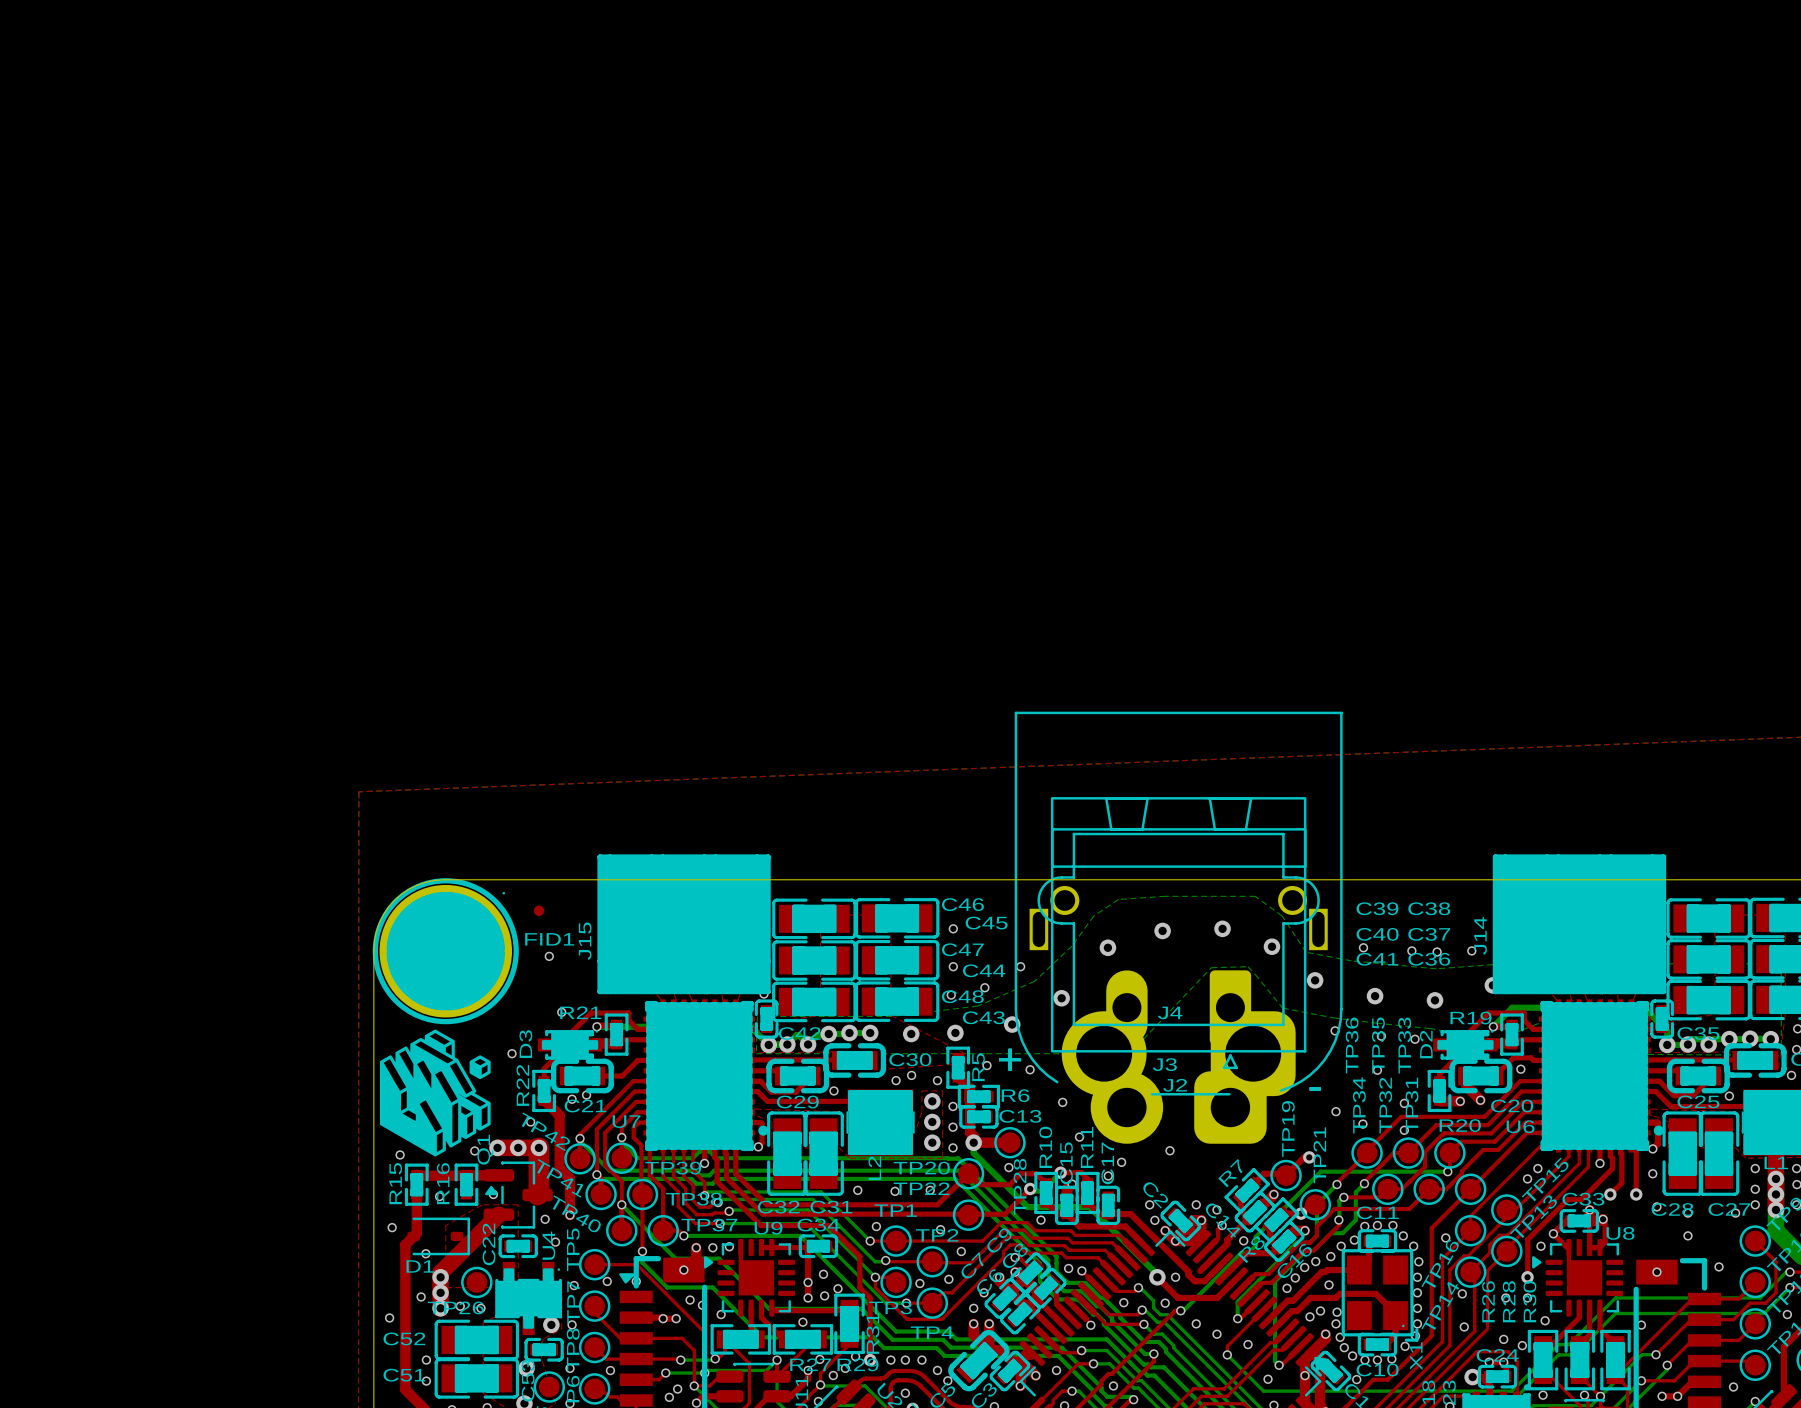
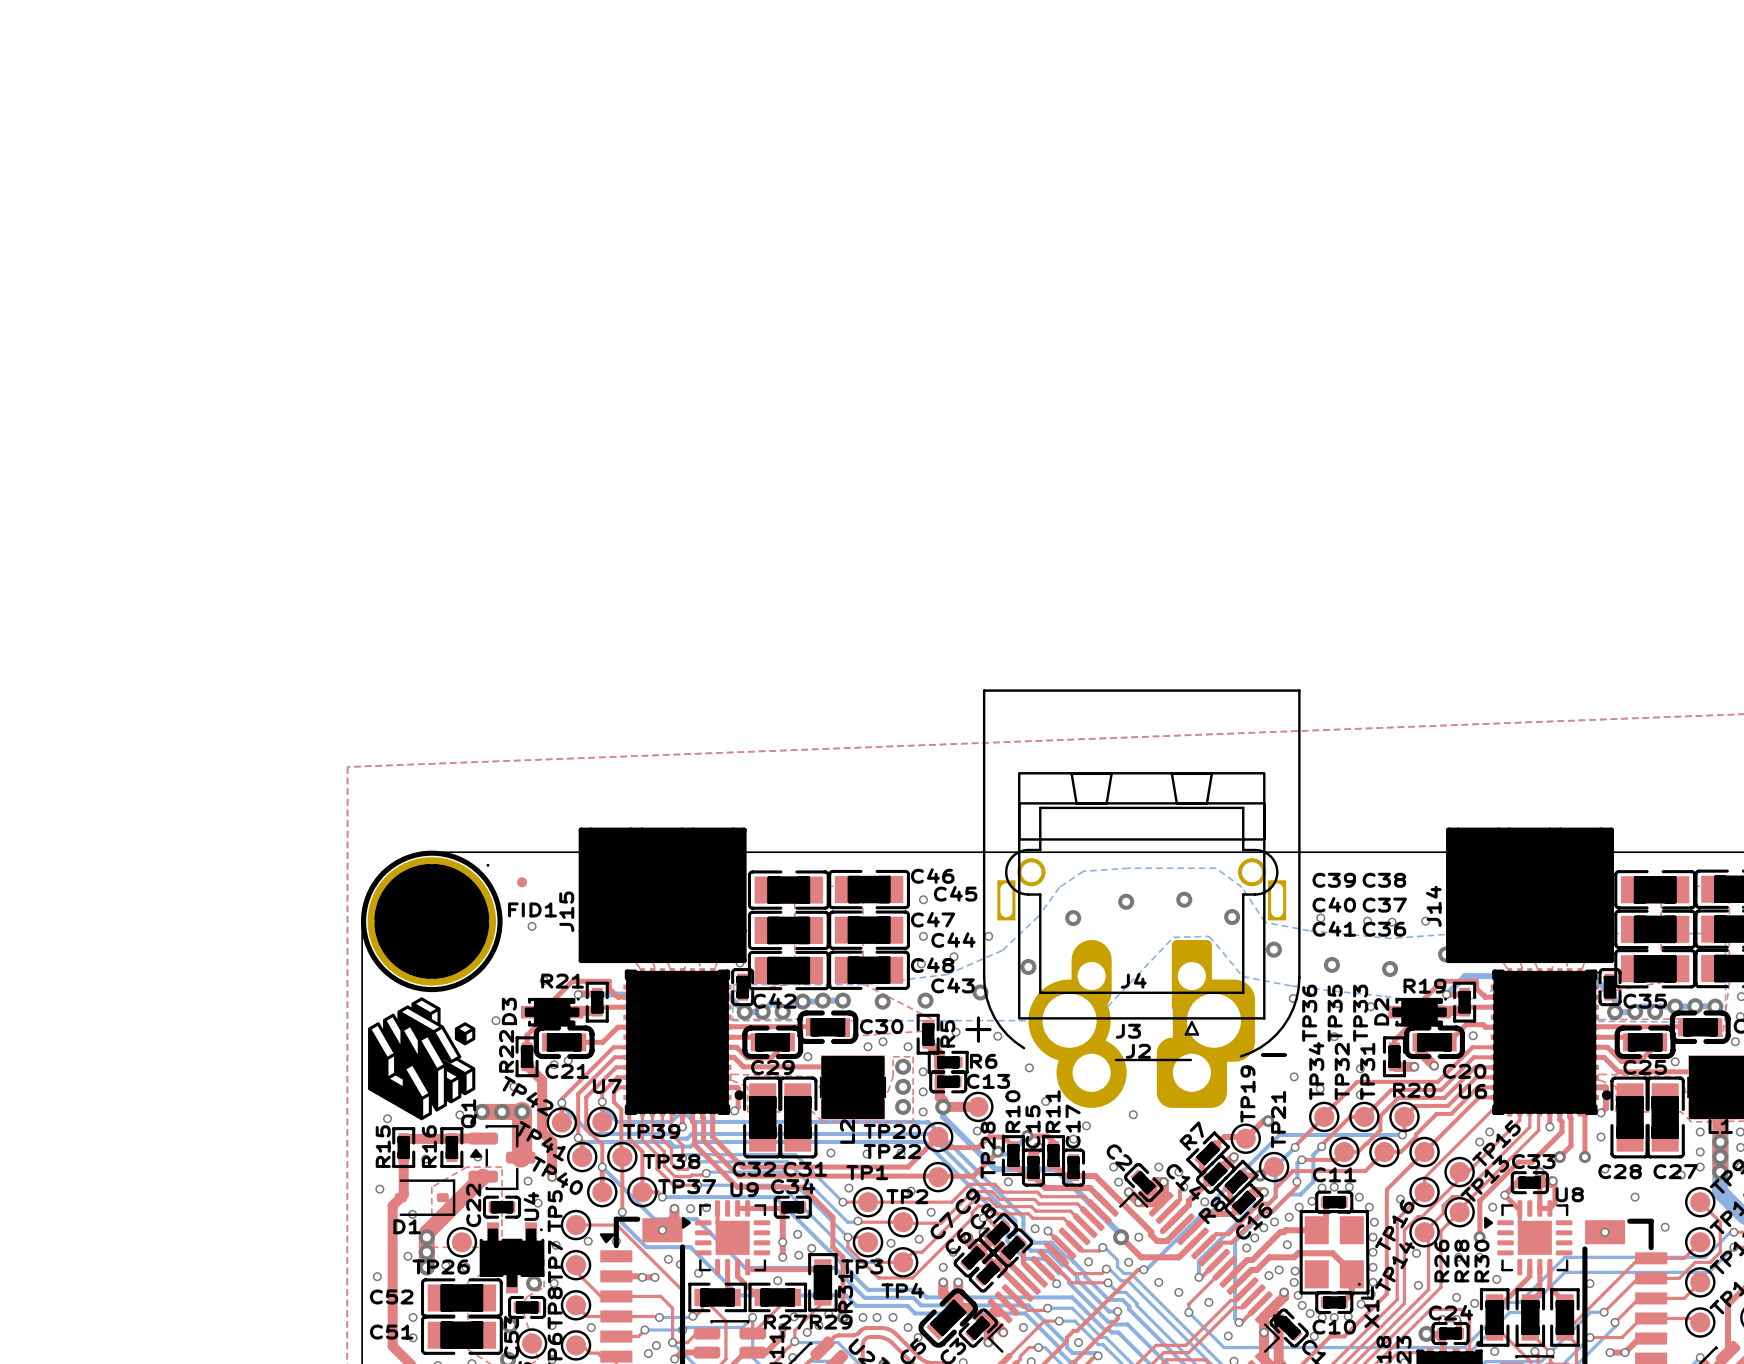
via: (1787, 1314) -> none
via: (1733, 1387) -> none
via: (905, 1393) -> none

